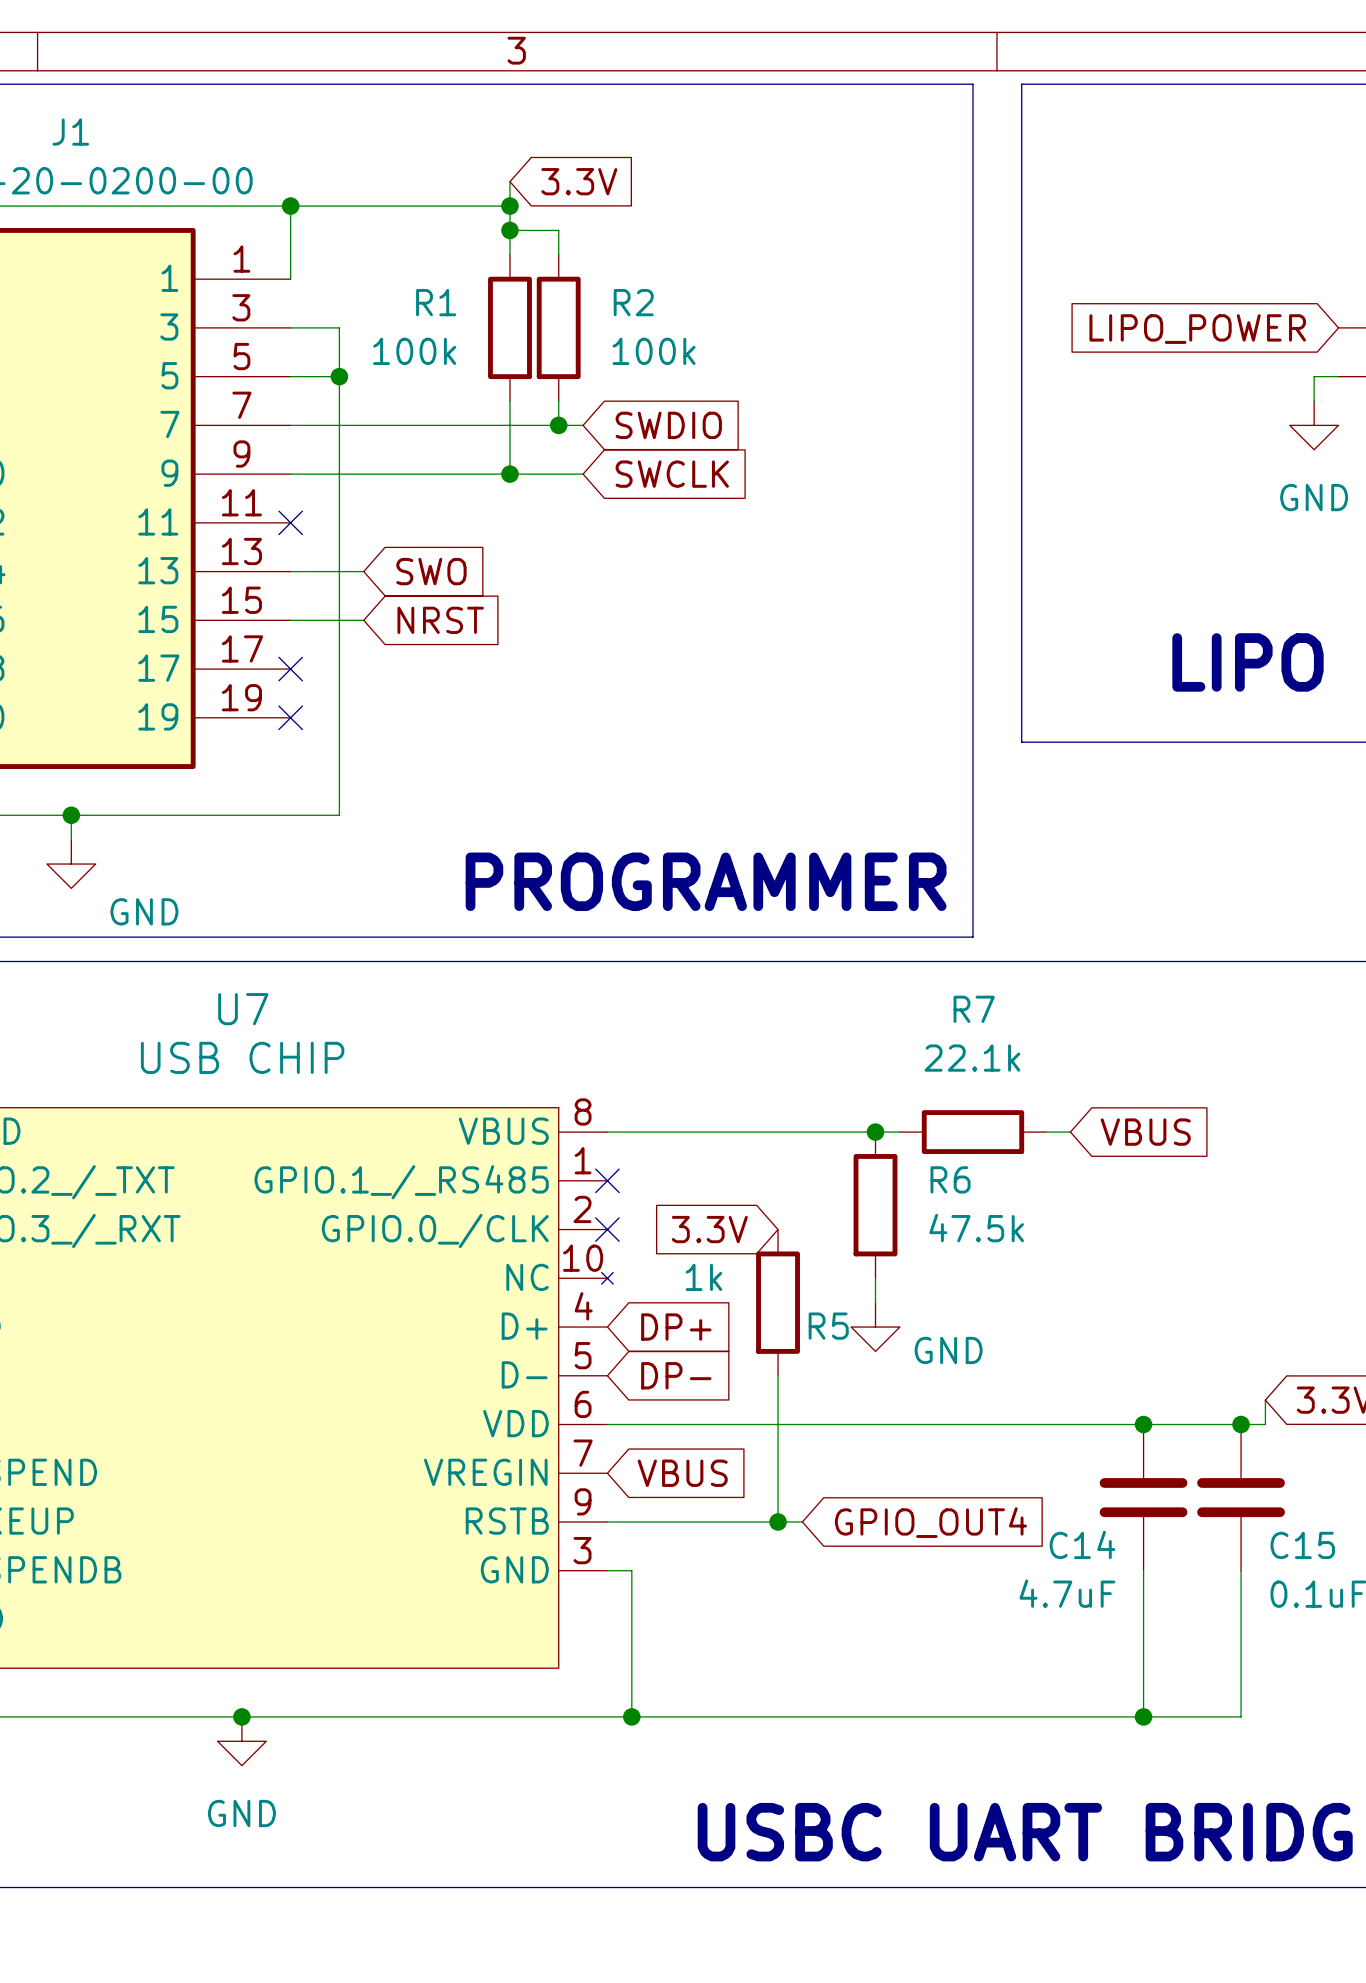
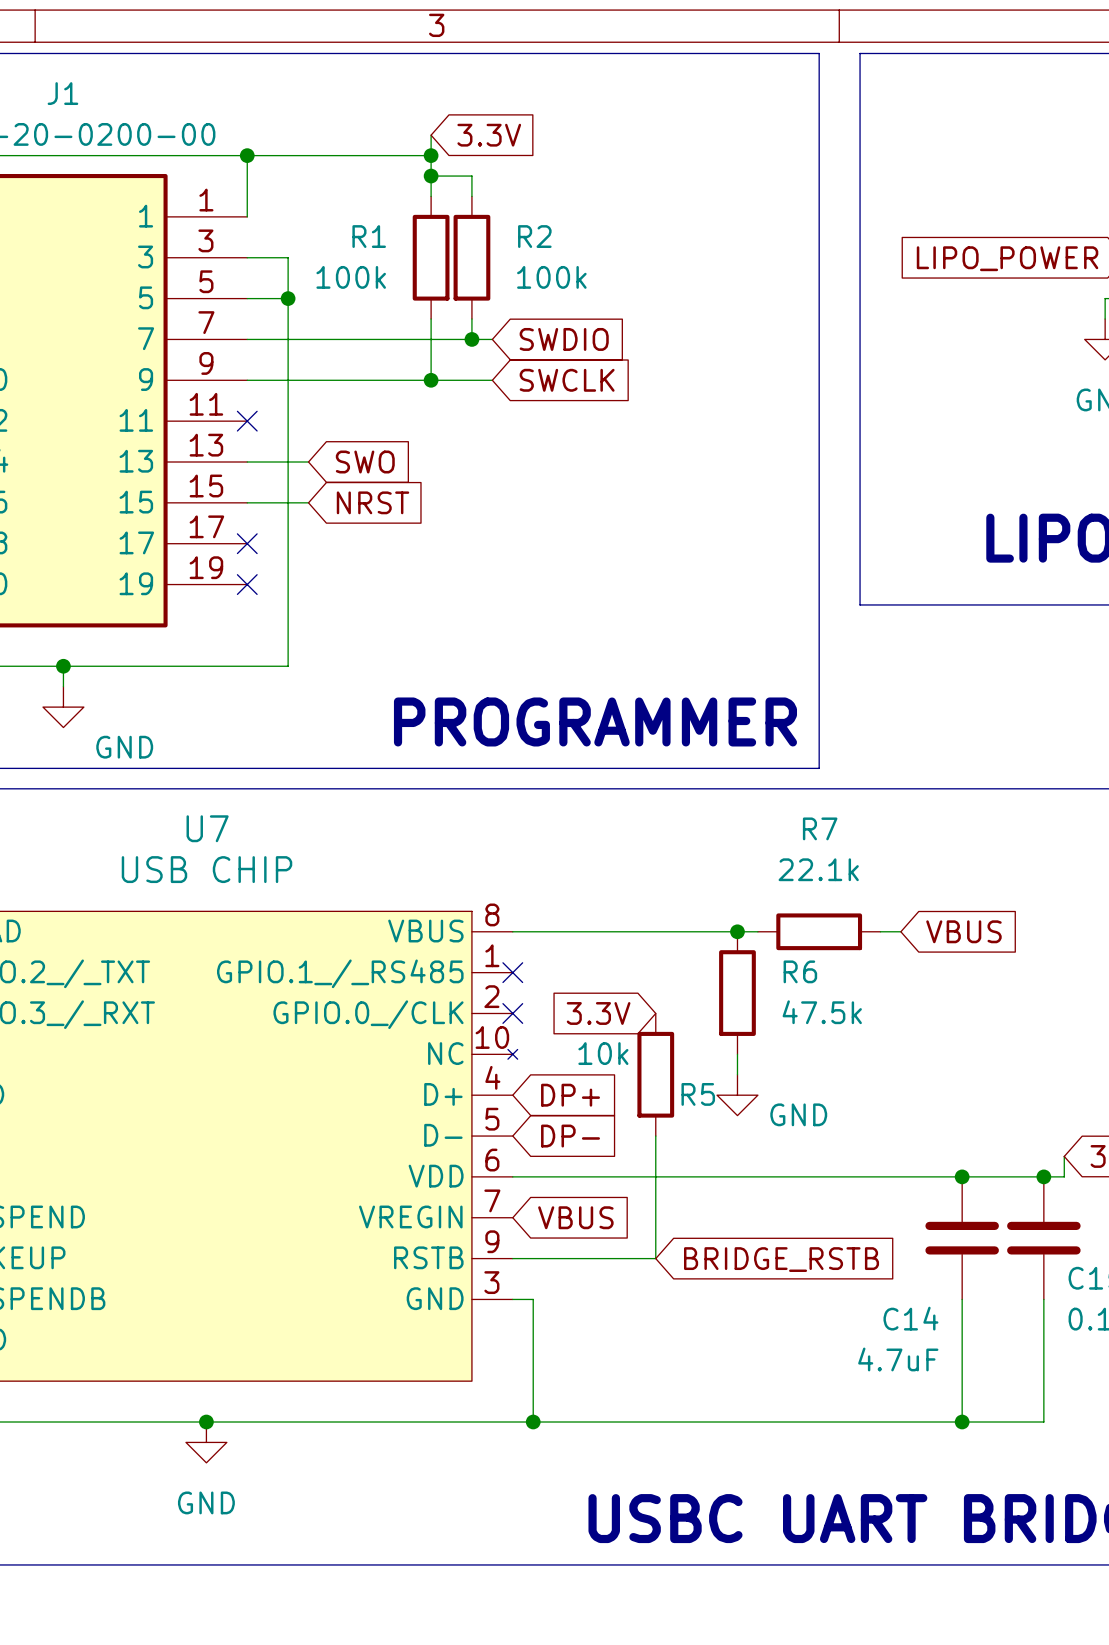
R5 value: 1k (703, 1277) -> 10k (603, 1053)
wire: (778, 1521) (802, 1521) -> none
junction: (778, 1521) -> none
global label: GPIO_OUT4 (930, 1522) -> none
global label: none -> BRIDGE_RSTB (781, 1259)
C14 name position: C14 (1082, 1544) -> C14 (910, 1318)
C14 value position: 4.7uF (1067, 1593) -> 4.7uF (898, 1359)

